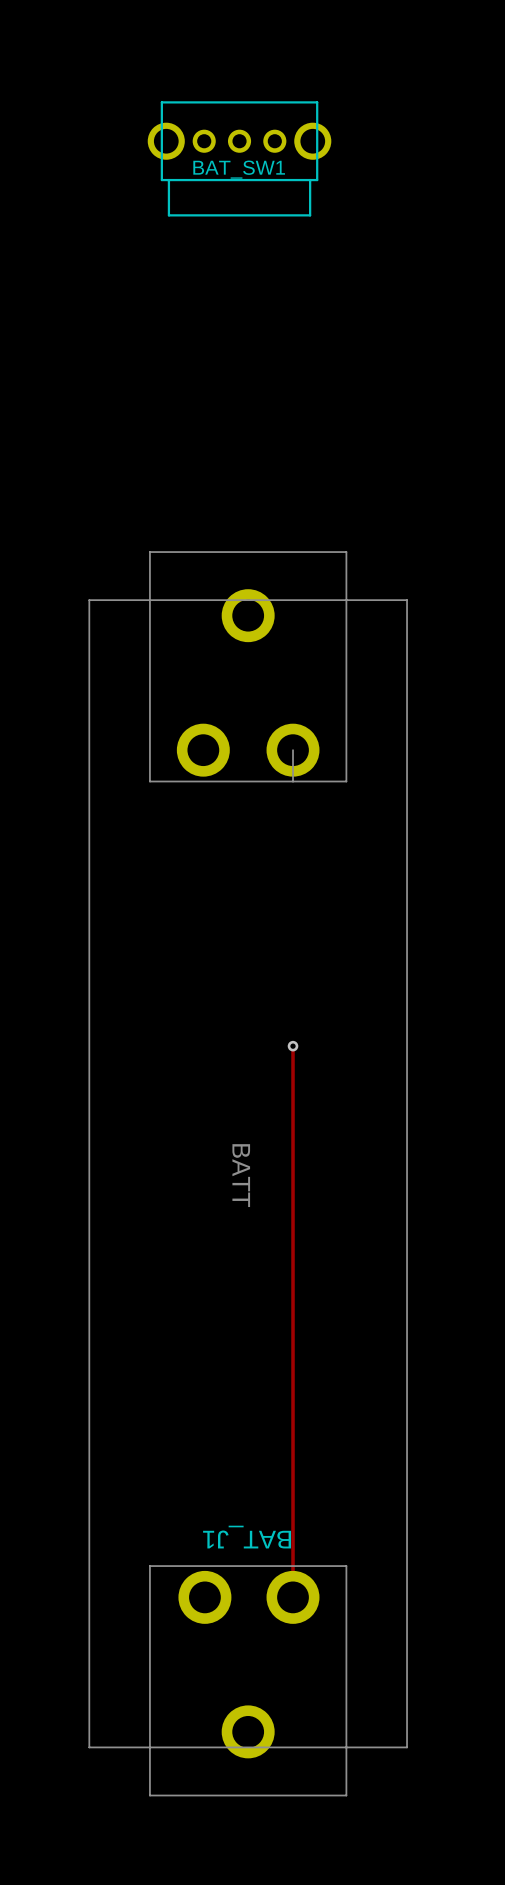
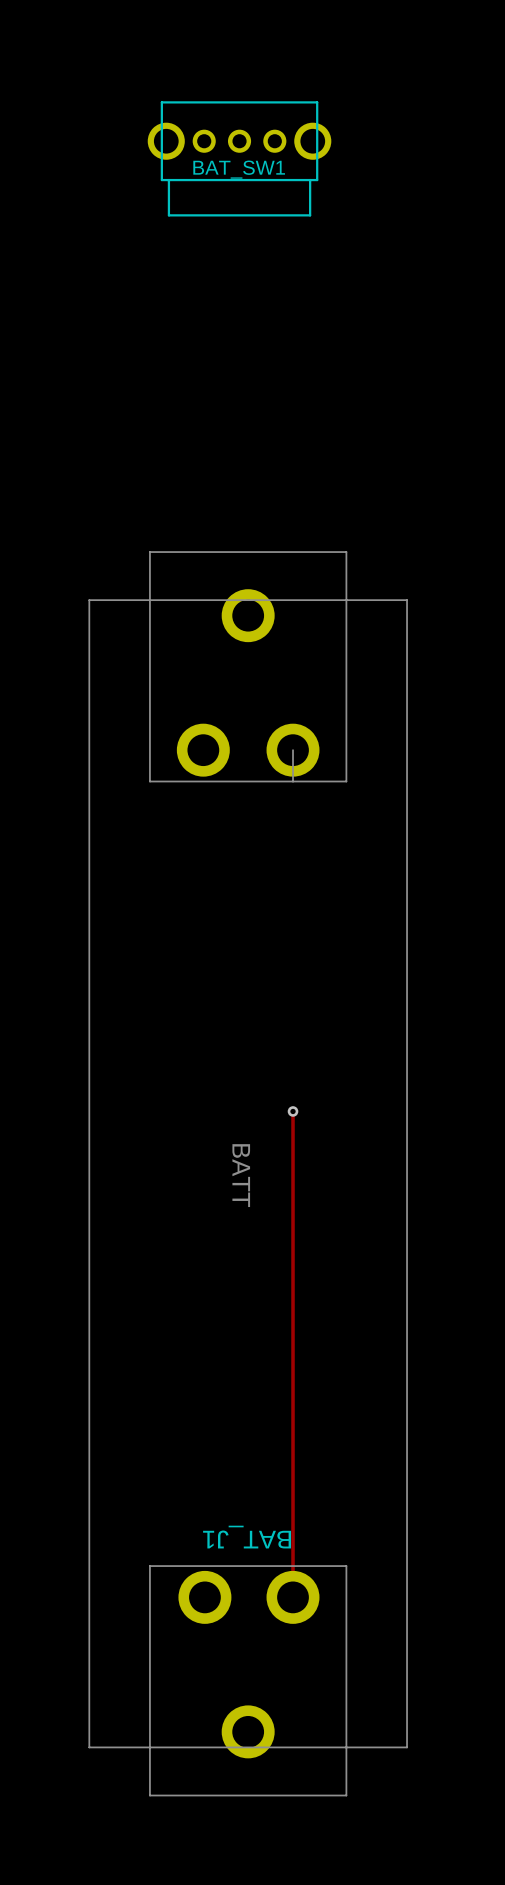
track: (293, 1046) (293, 1111) -> none
via position: (293, 1046) -> (293, 1111)

